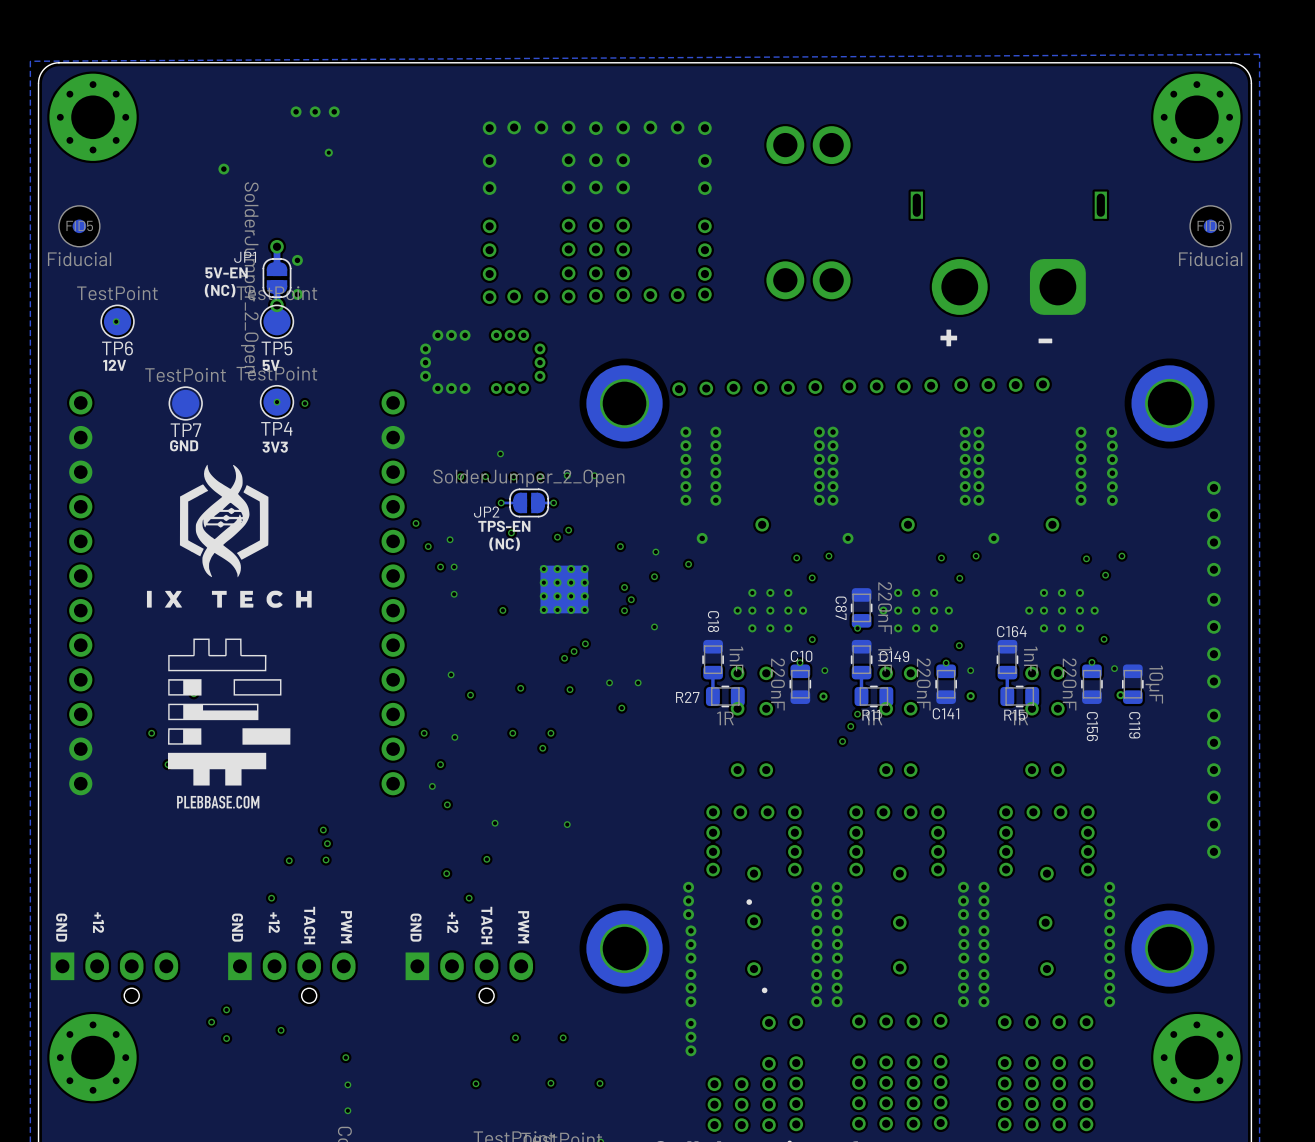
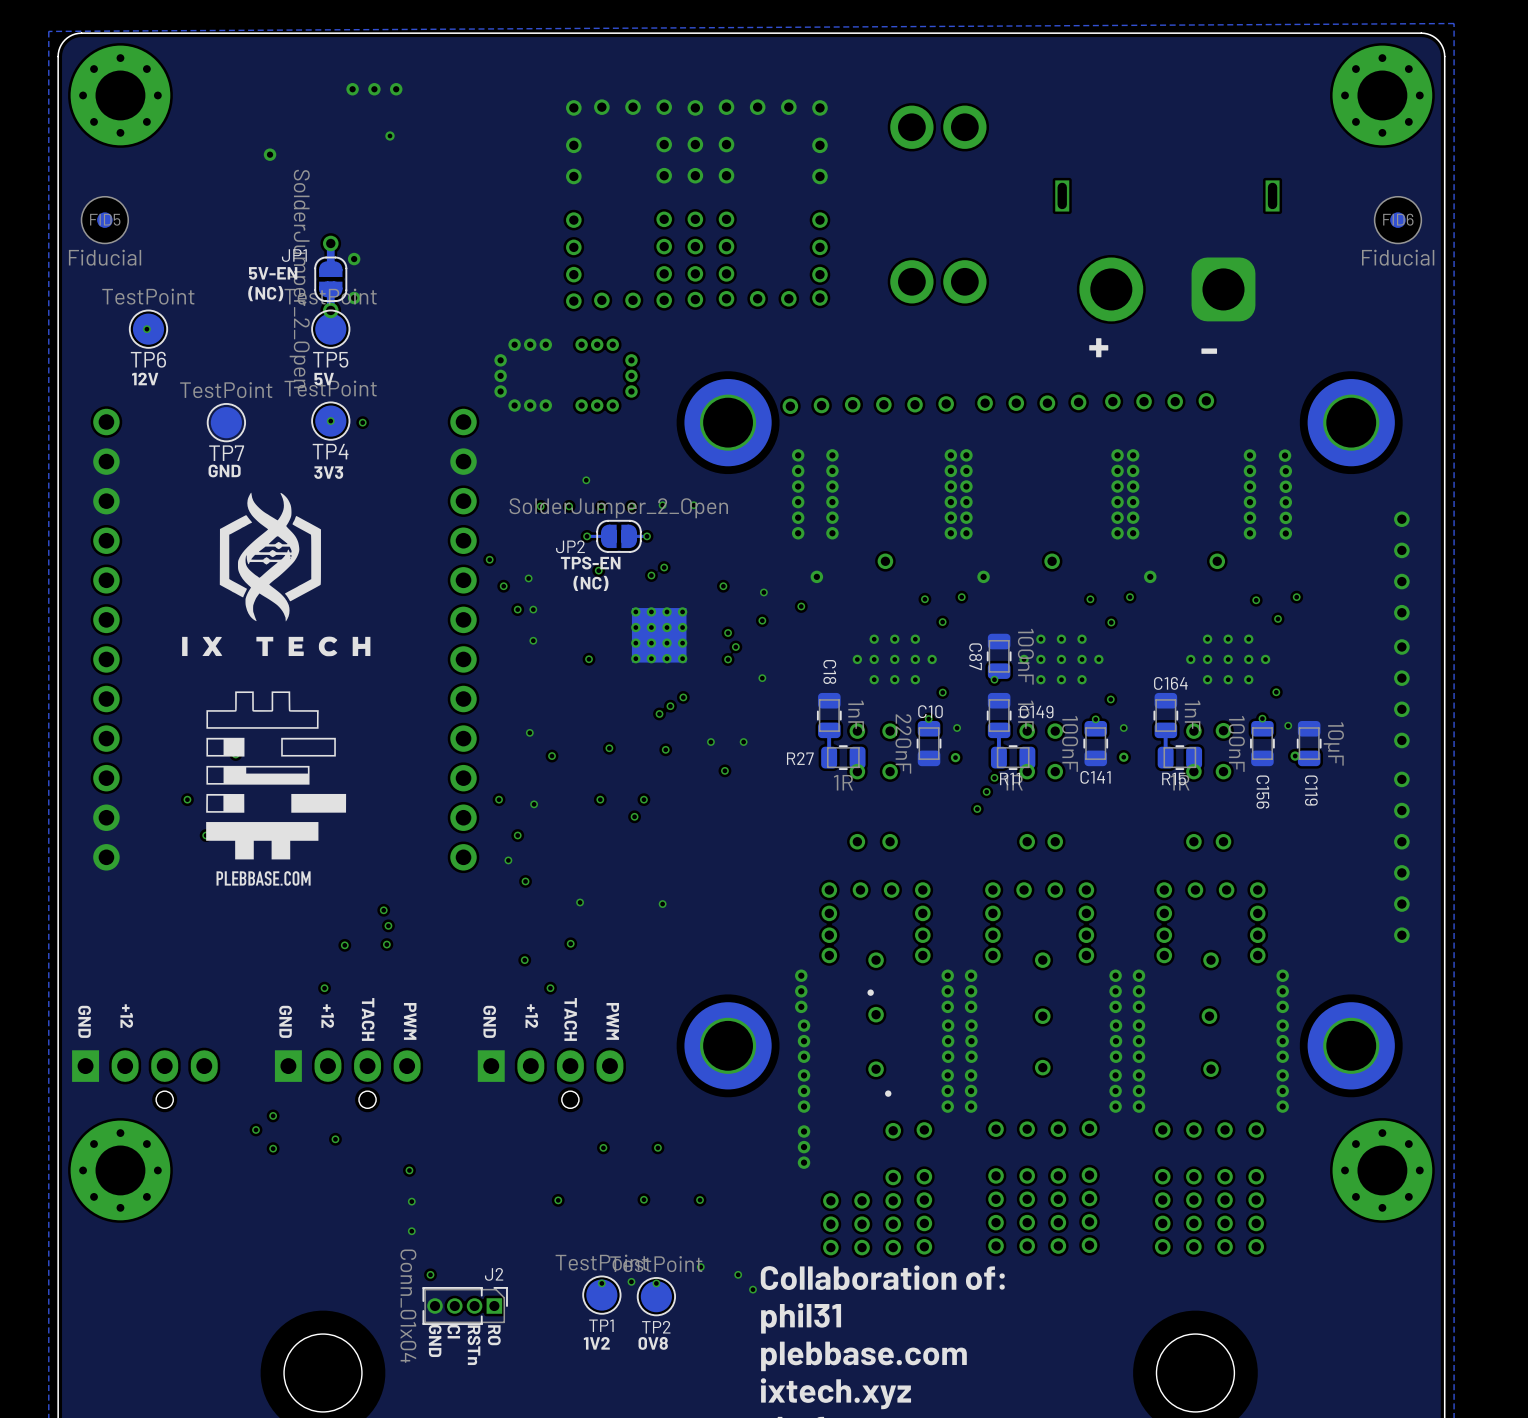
C87 value: 220nF (885, 608) -> 100nF (1025, 656)
C141 value: 220nF (923, 684) -> 100nF (1070, 743)
C156 value: 220nF (1069, 684) -> 100nF (1236, 743)

